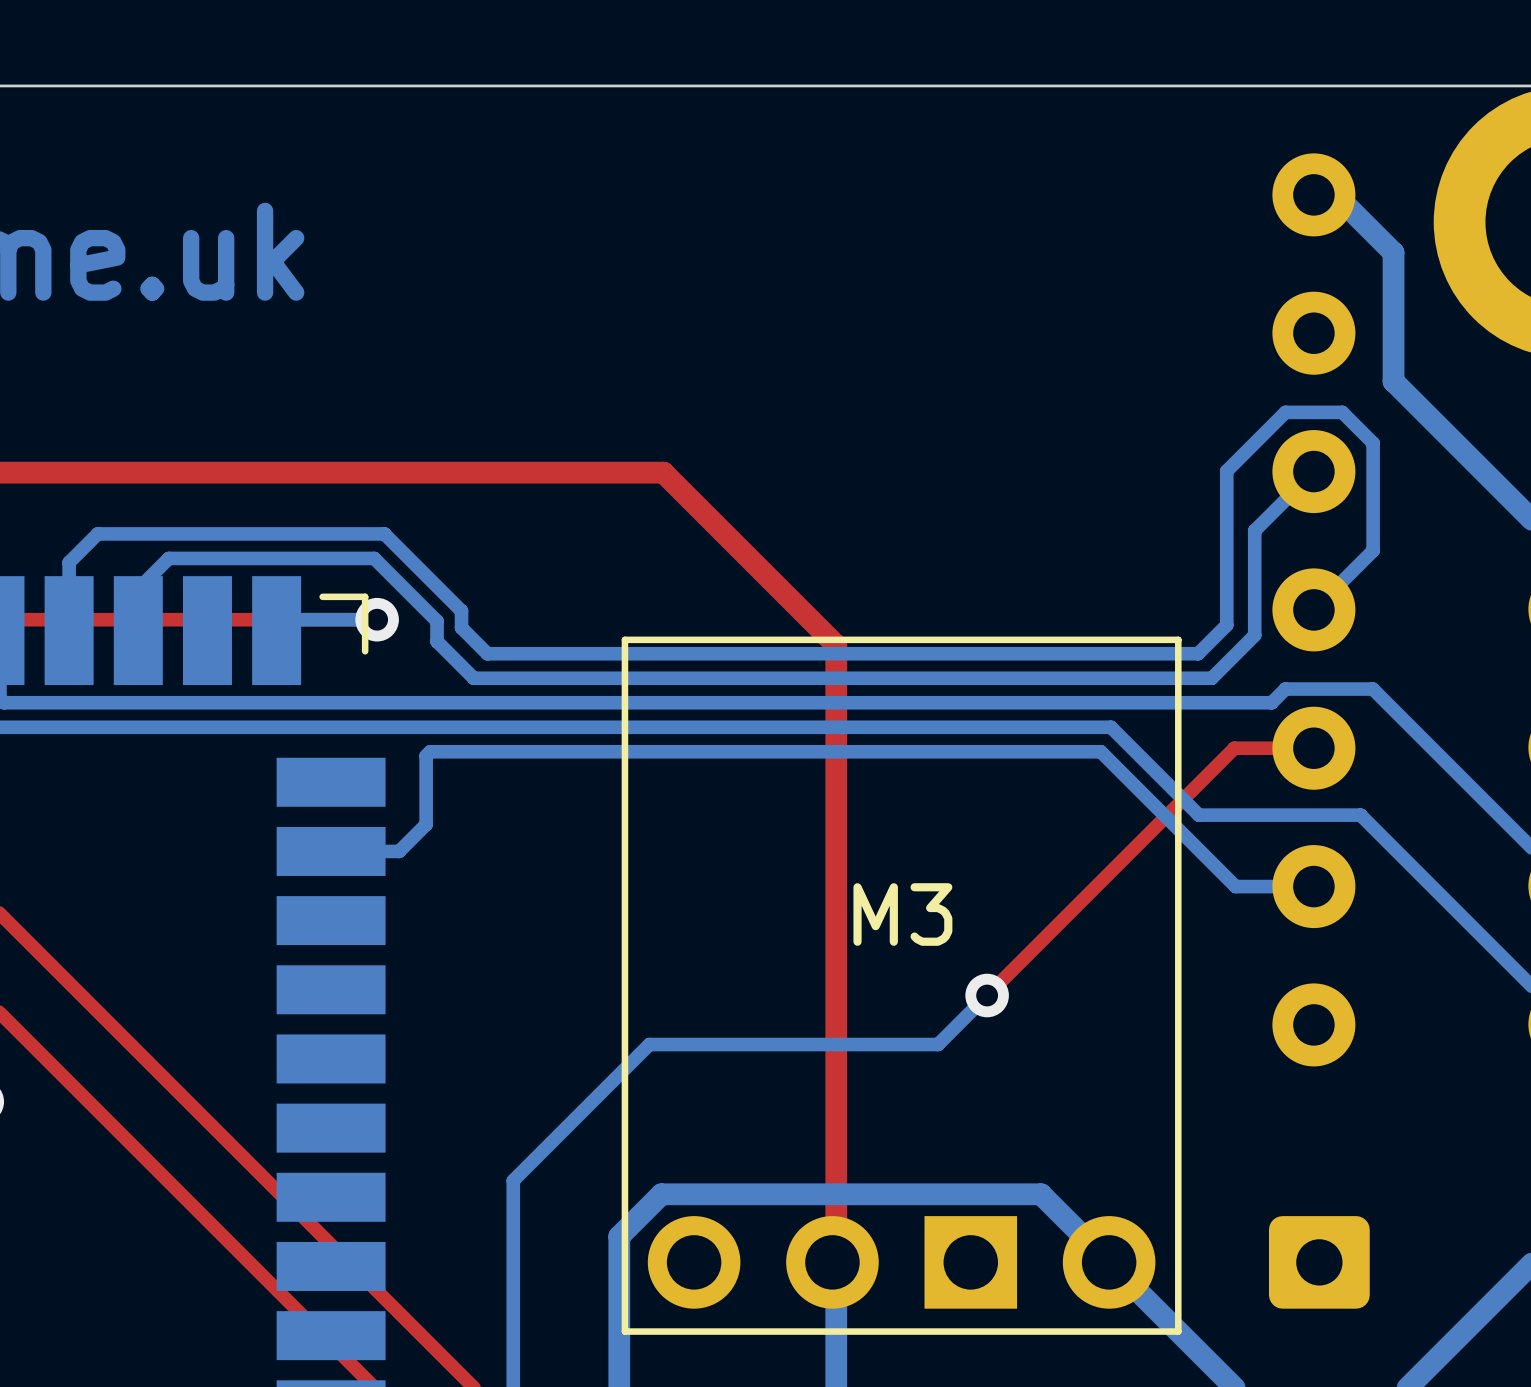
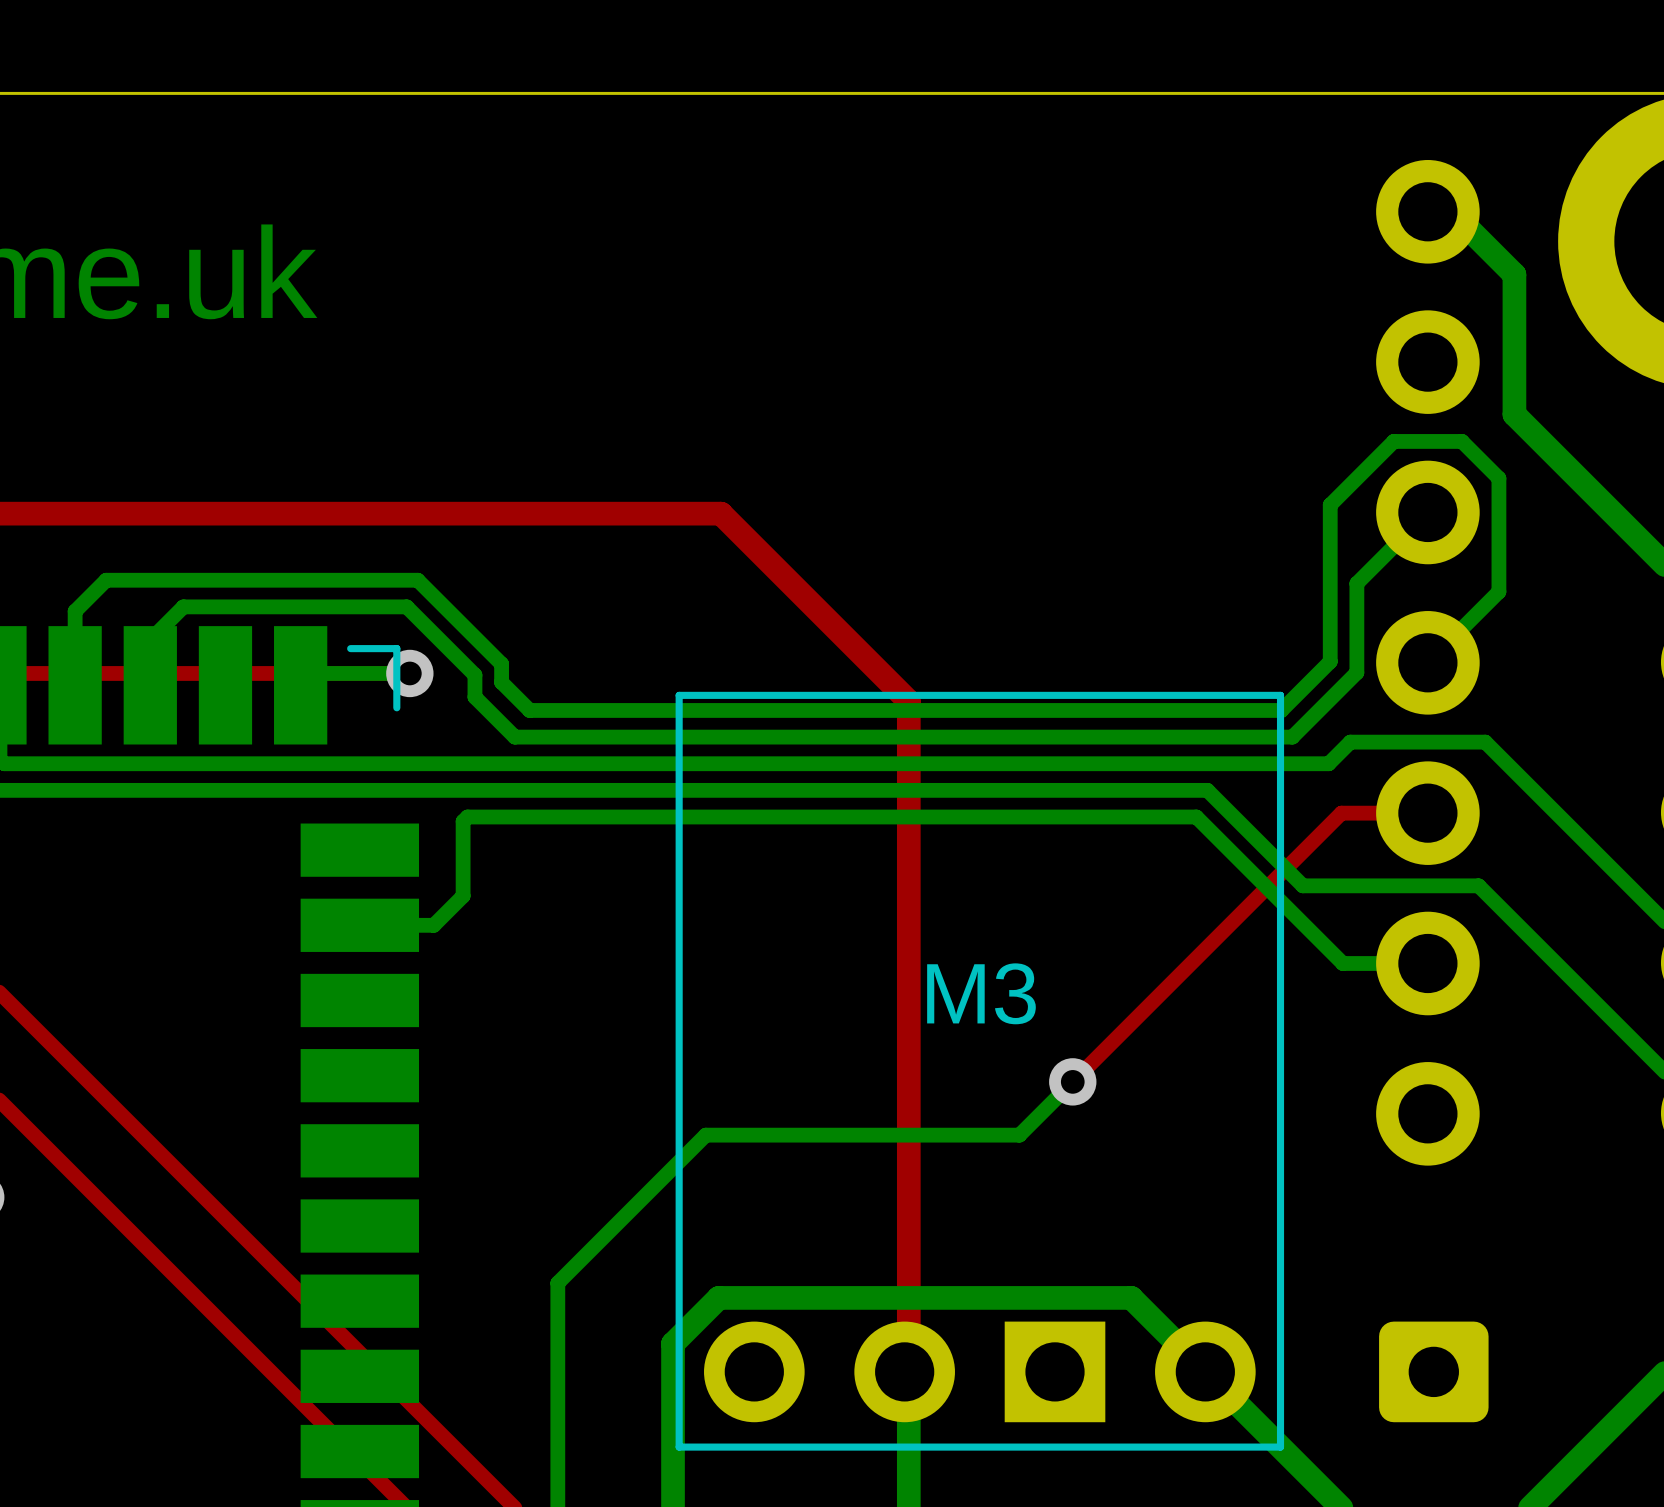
part footprint: [1272, 153, 1356, 1067] -> [1376, 160, 1480, 1166]
bottom track: (1254, 530) (1254, 635) (1211, 678) (1189, 678) -> (1363, 576) (1356, 583) (1356, 672) (1292, 737)
bottom track: (1373, 550) (1373, 443) (1342, 412) (1285, 412) (1226, 471) (1226, 625) (1198, 653) (1179, 653) -> (1492, 598) (1498, 591) (1498, 478) (1461, 441) (1393, 441) (1330, 505) (1330, 661) (1281, 710)
bottom track: (1372, 689) (1285, 689) (1271, 702) (1222, 702) -> (1492, 748) (1485, 742) (1350, 742) (1328, 763)

